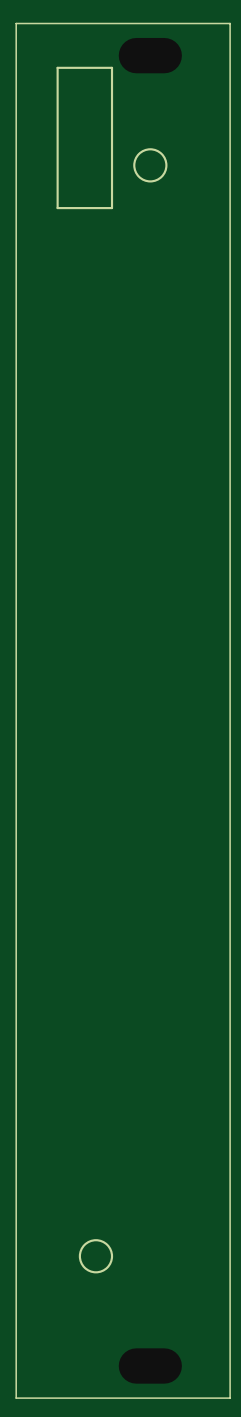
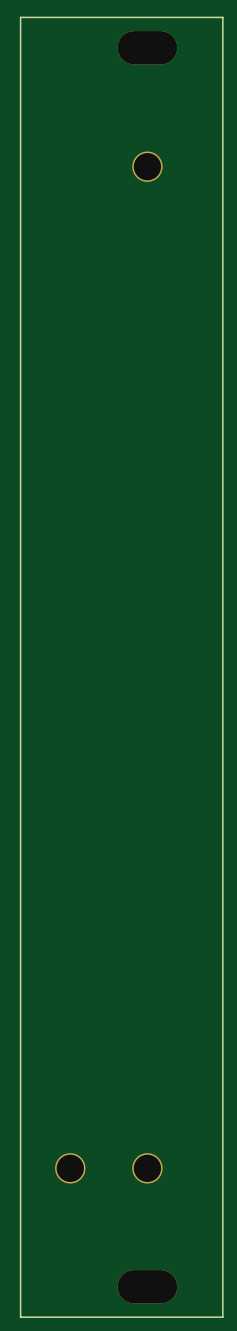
part footprint: [118, 37, 182, 74] -> [117, 31, 178, 65]
board edge: (112, 67) (57, 67) (57, 208) (112, 208) (112, 67) -> none
round board edge: [133, 148, 168, 183] -> none
via: none -> (147, 166)
round board edge: [78, 1239, 114, 1274] -> none
via: none -> (70, 1168)
via: none -> (147, 1168)
part footprint: [118, 1348, 182, 1384] -> [117, 1270, 178, 1304]

